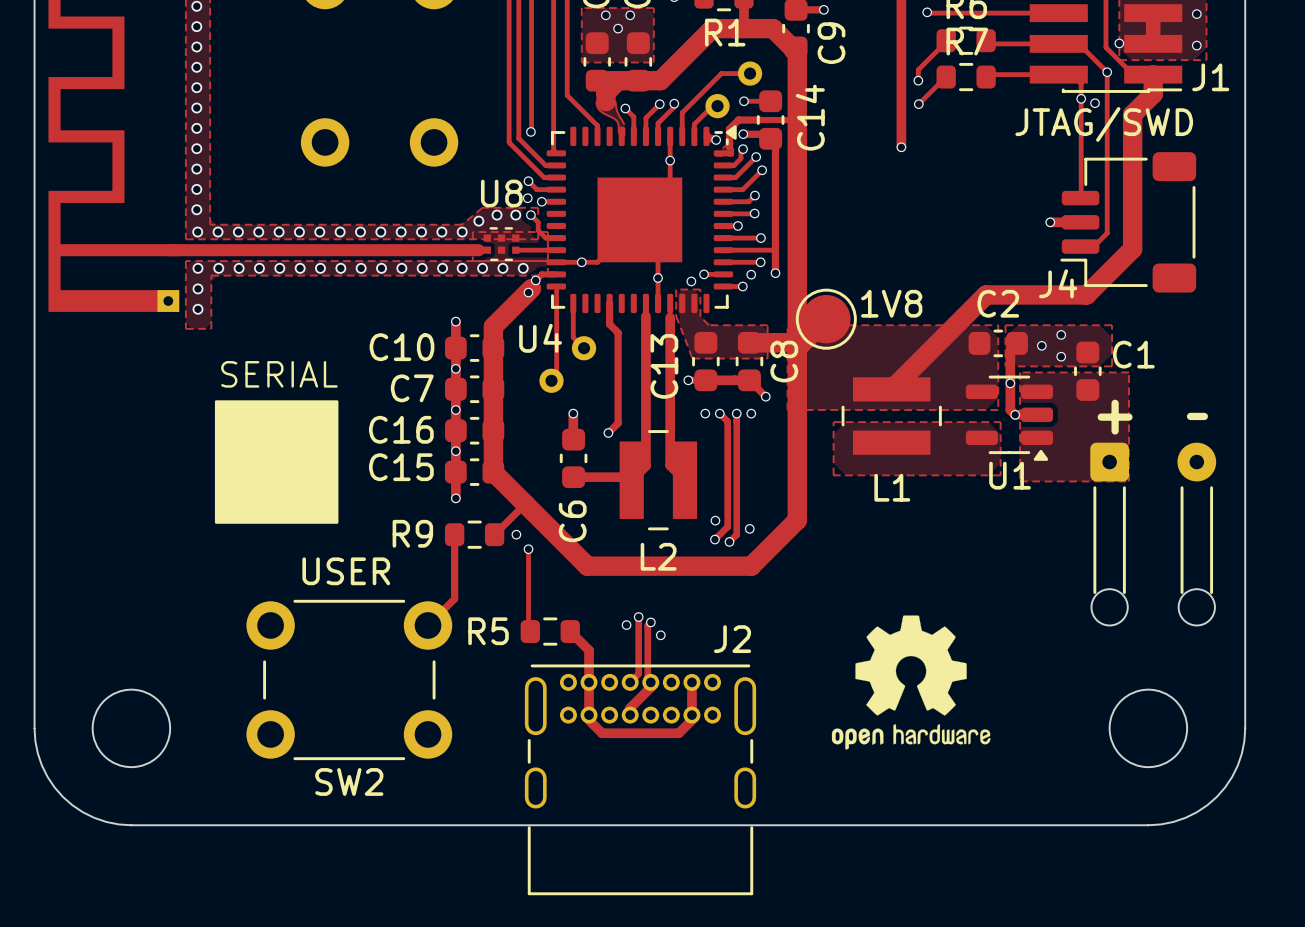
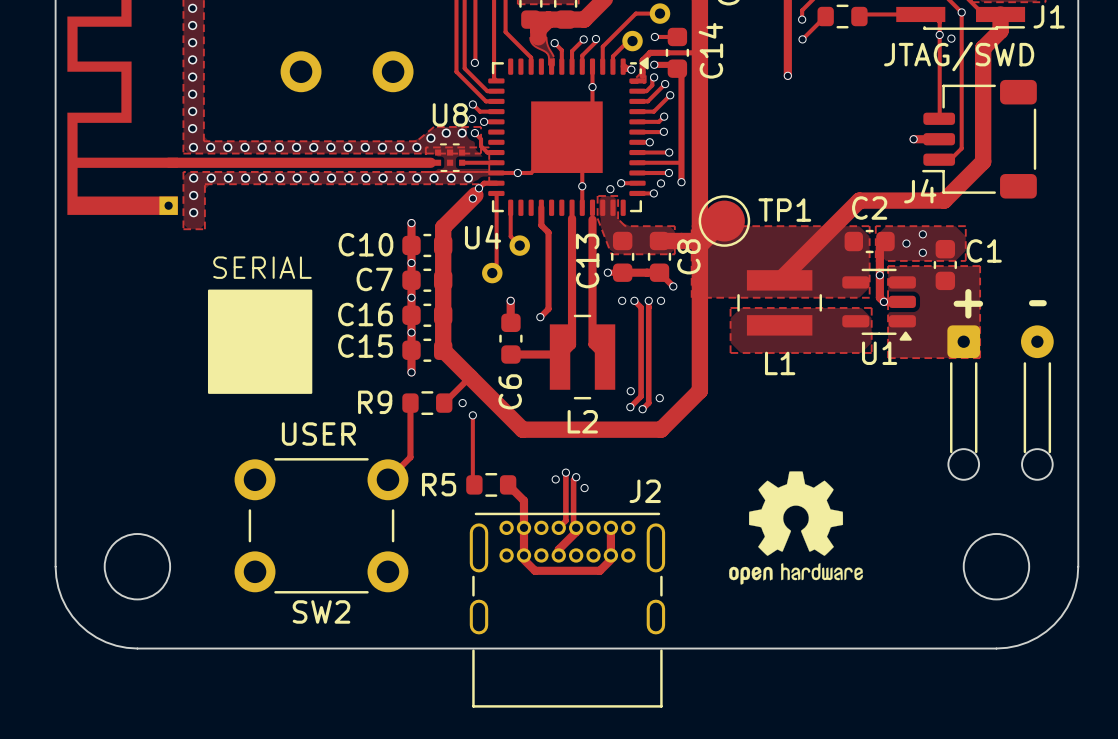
1V8 name: 1V8 (891, 303) -> TP1 (784, 210)

